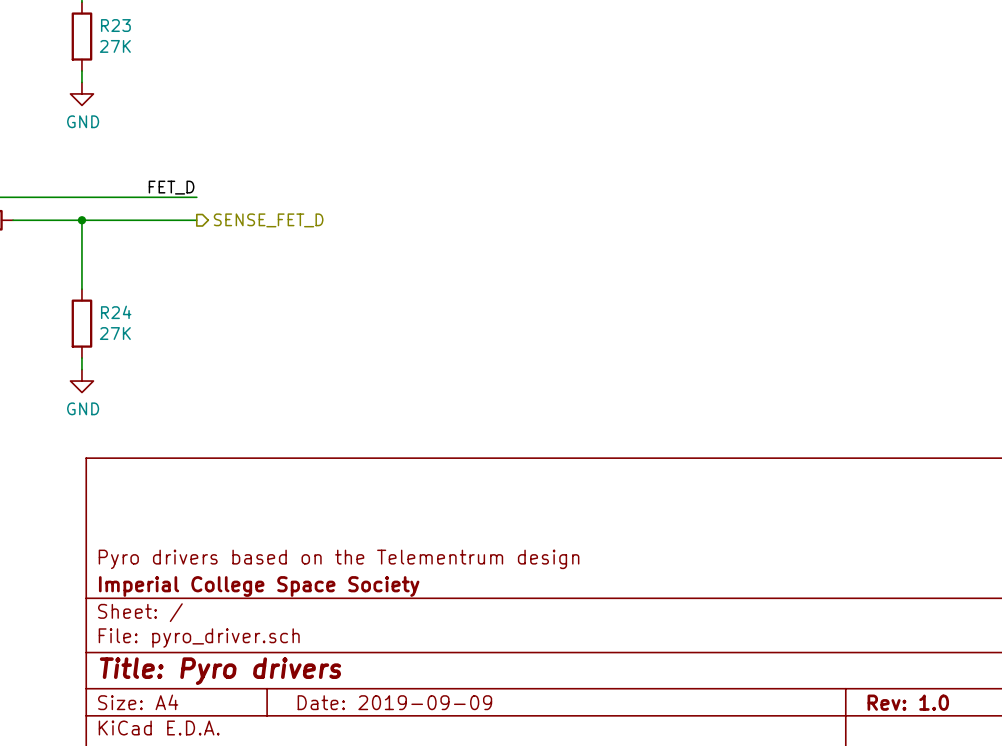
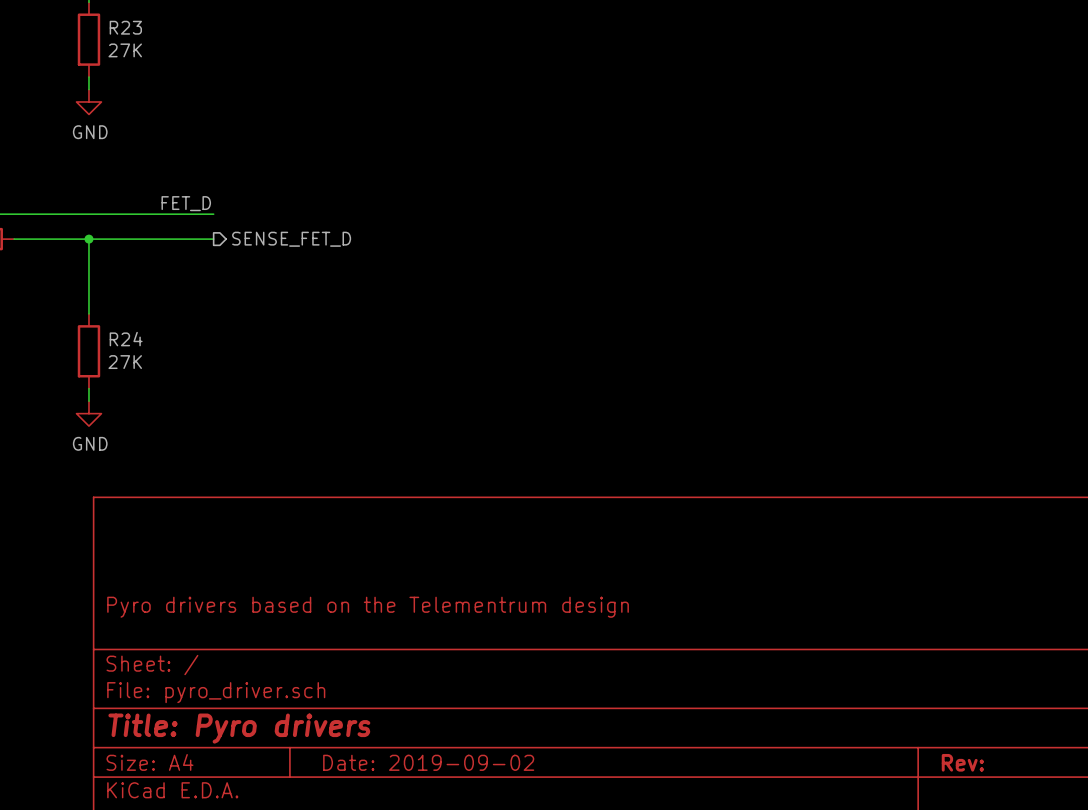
title block: Imperial College Space Society (259, 586) -> none
title block: Date: 2019-09-09 (394, 702) -> Date: 2019-09-02 (428, 762)
title block: Rev: 1.0 (908, 702) -> Rev: (962, 762)

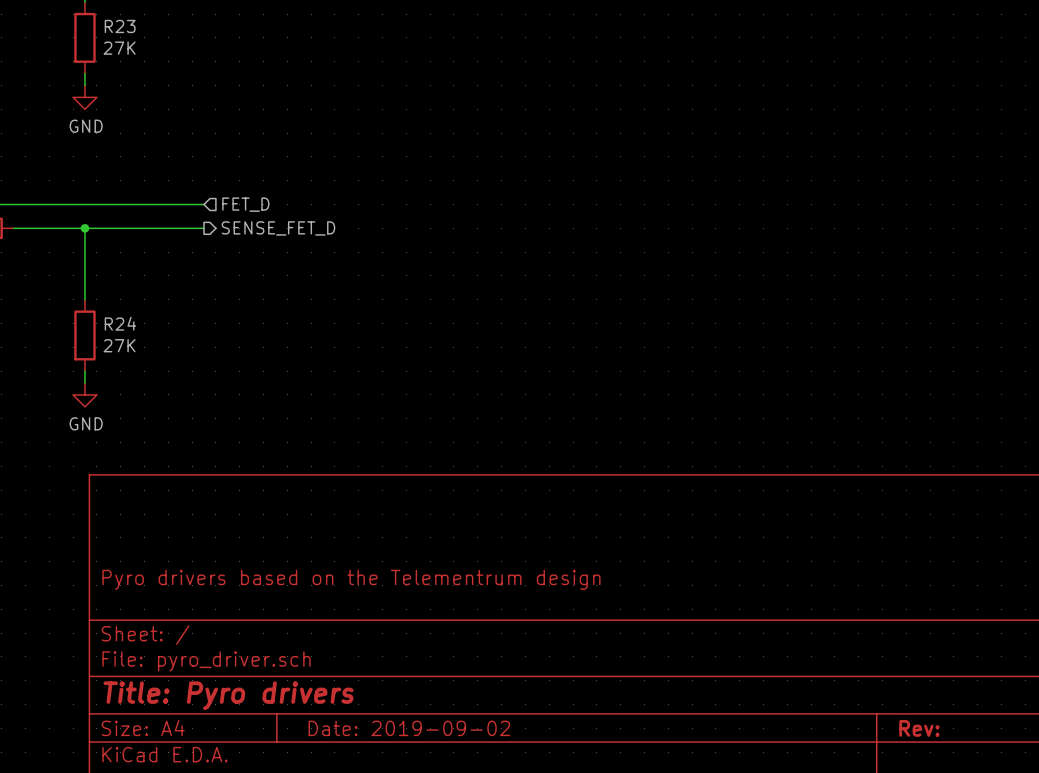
label: FET_D (186, 203) -> none
hierarchical label: none -> FET_D (245, 204)

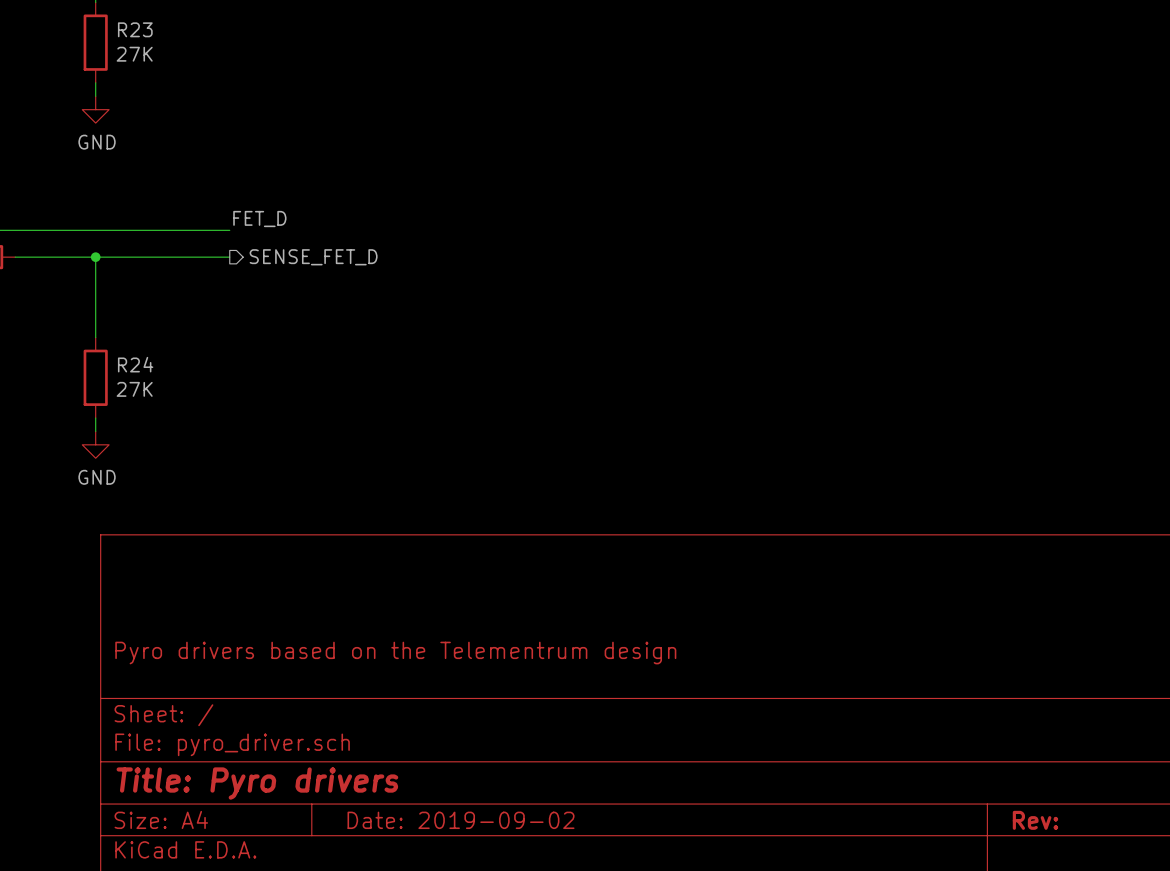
label: none -> FET_D (259, 219)
hierarchical label: FET_D (245, 204) -> none

